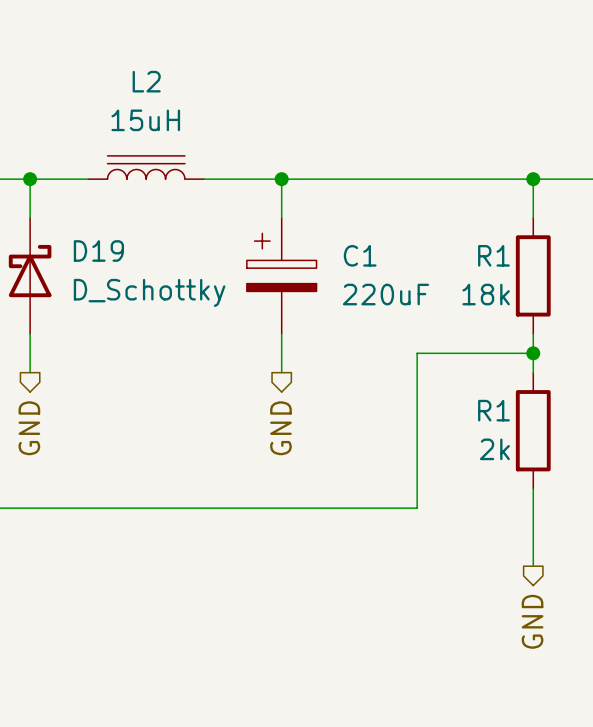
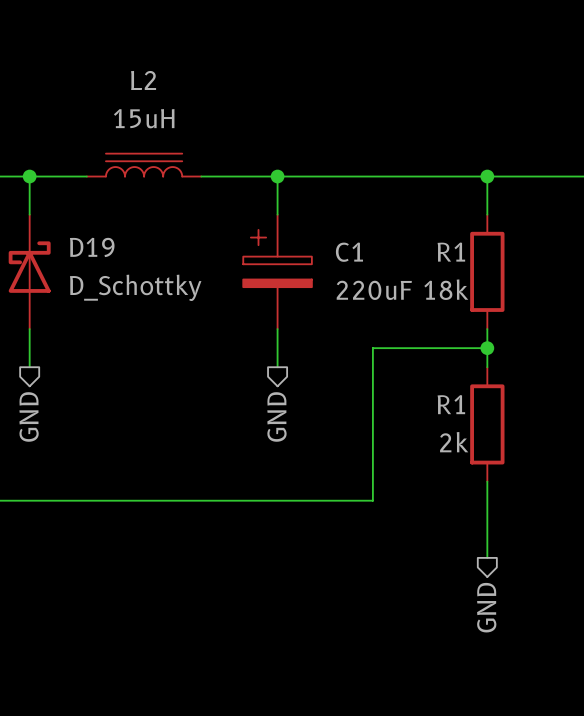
wire: (533, 179) (533, 217) -> (487, 176) (487, 214)
junction position: (533, 179) -> (487, 176)
R1 position: (533, 275) -> (487, 271)
wire: (533, 333) (533, 372) -> (487, 329) (487, 367)
wire: (417, 353) (417, 508) (378, 508) -> (411, 348) (372, 348) (372, 500)
wire: (494, 353) (533, 353) -> none
junction position: (533, 353) -> (487, 348)
R1 position: (533, 430) -> (487, 424)
wire: (533, 488) (533, 566) -> (487, 481) (487, 557)
hierarchical label position: GND (532, 621) -> GND (486, 607)

